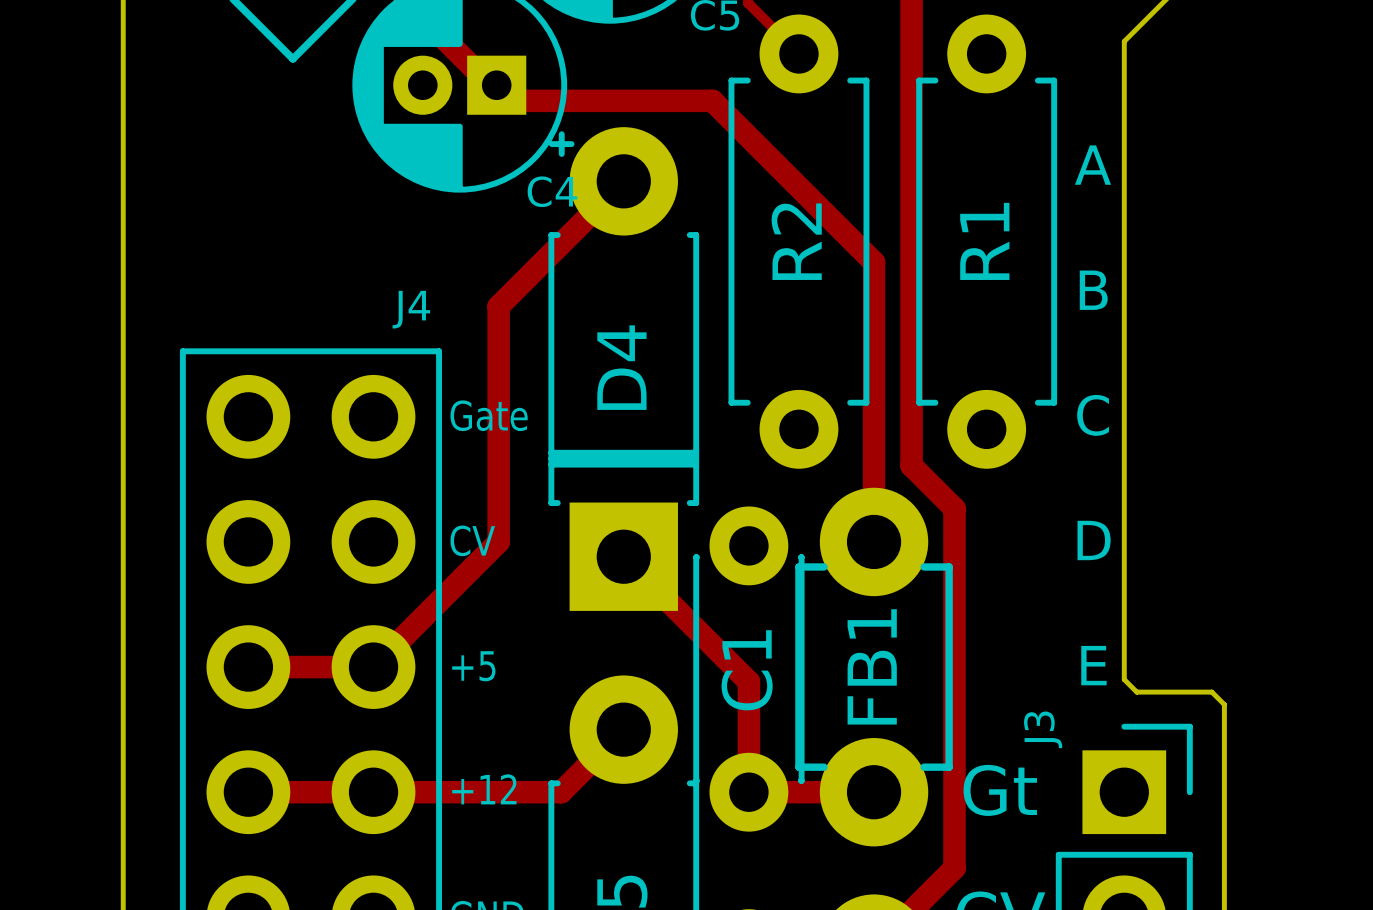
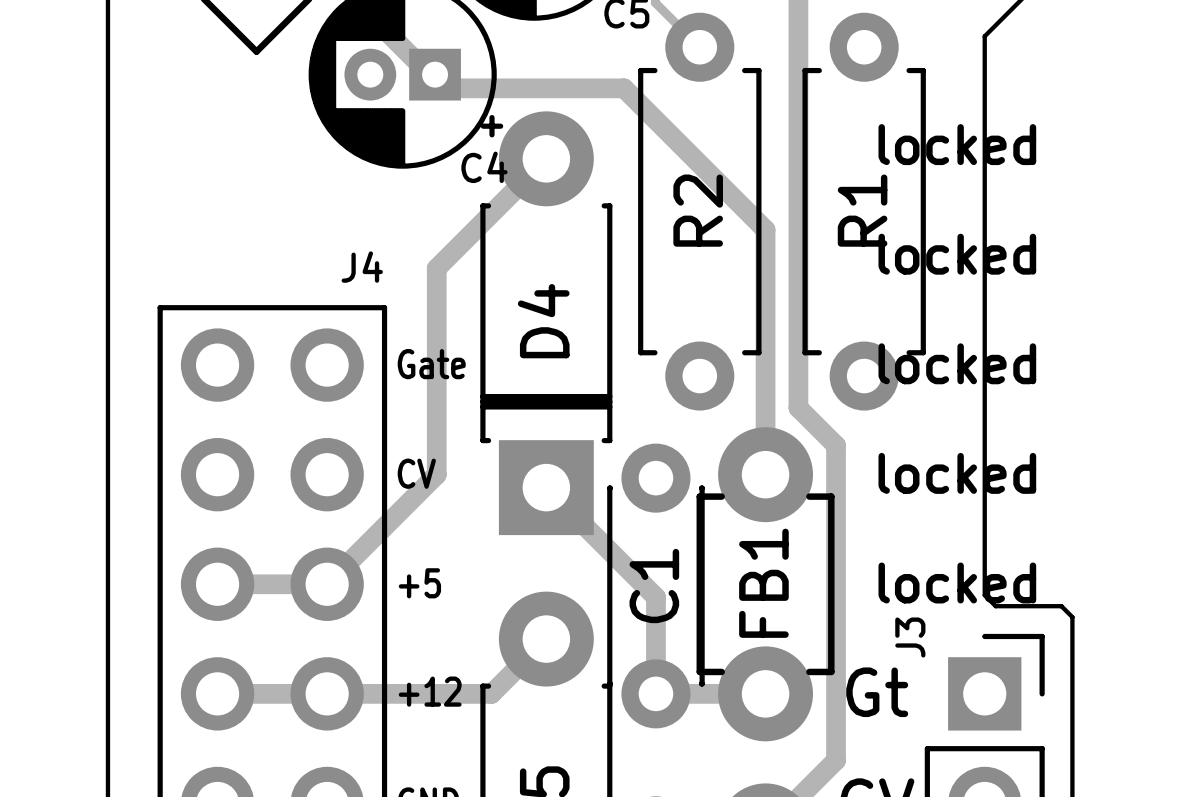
text: A (1093, 165) -> locked (957, 144)
text: B (1093, 290) -> locked (957, 254)
text: C (1093, 415) -> locked (957, 363)
text: D (1094, 540) -> locked (957, 473)
text: E (1093, 665) -> locked (957, 582)

